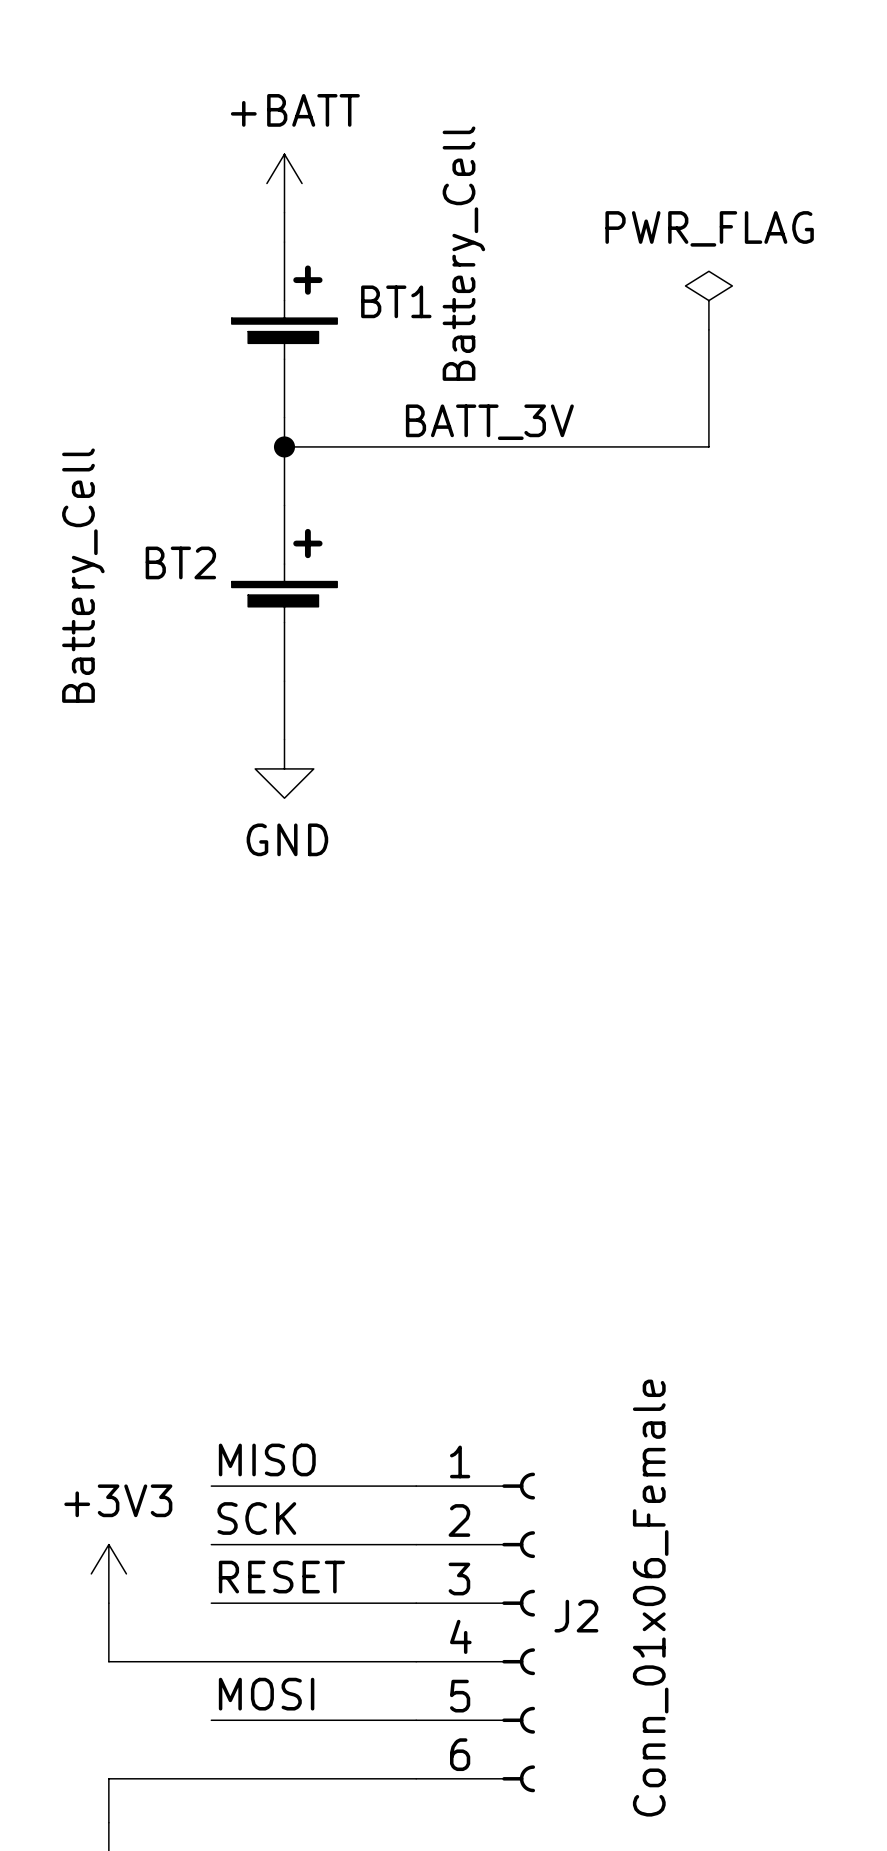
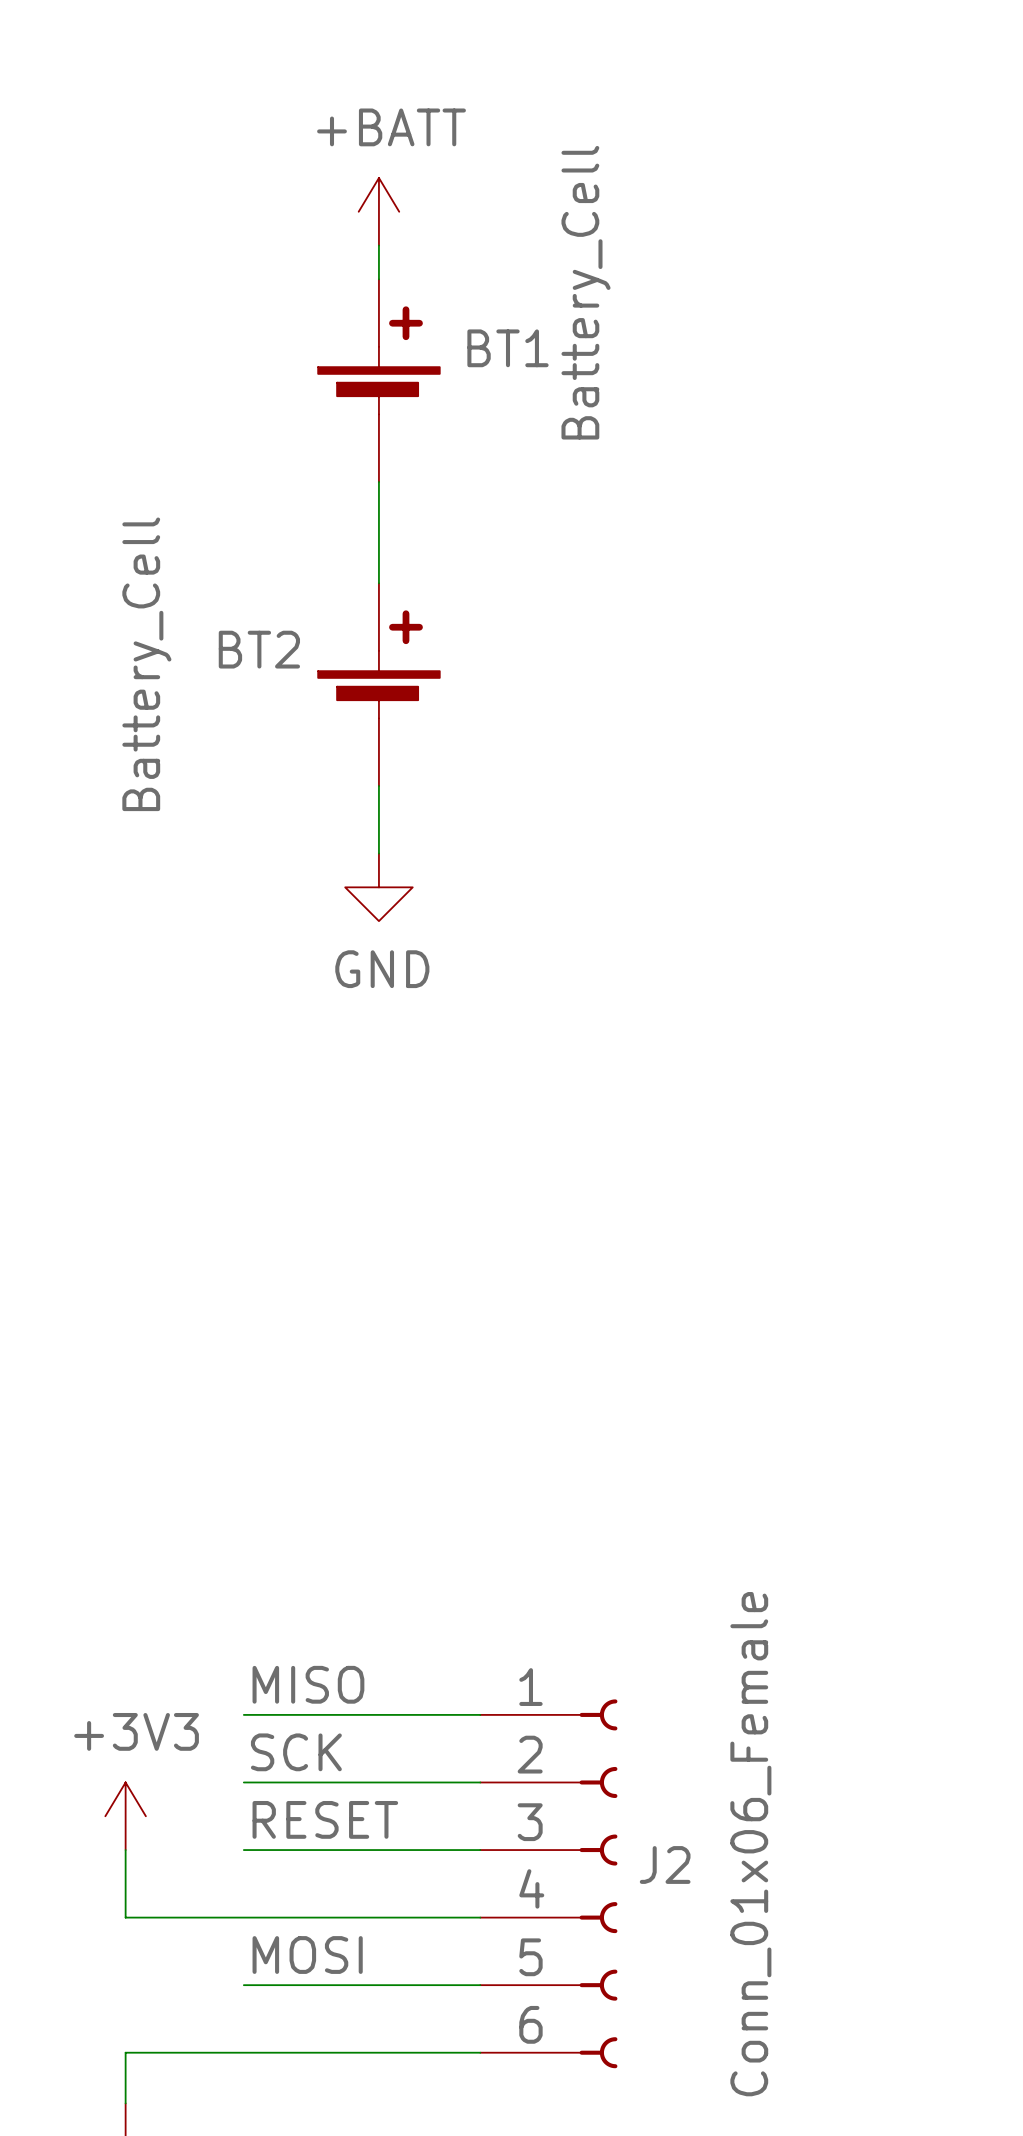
power symbol position: +BATT (284, 183) -> +BATT (378, 211)
wire: (284, 212) (284, 242) -> (378, 245) (378, 279)
power symbol: PWR_FLAG (708, 300) -> none
BT1 position: (284, 329) -> (378, 380)
wire: (708, 329) (708, 446) (284, 446) -> none
wire: (284, 417) (284, 505) -> (378, 481) (378, 583)
label: BATT_3V (489, 422) -> none
junction: (284, 446) -> none
BT2 position: (284, 593) -> (378, 684)
wire: (284, 681) (284, 739) -> (378, 786) (378, 853)
power symbol position: GND (284, 768) -> GND (378, 887)

